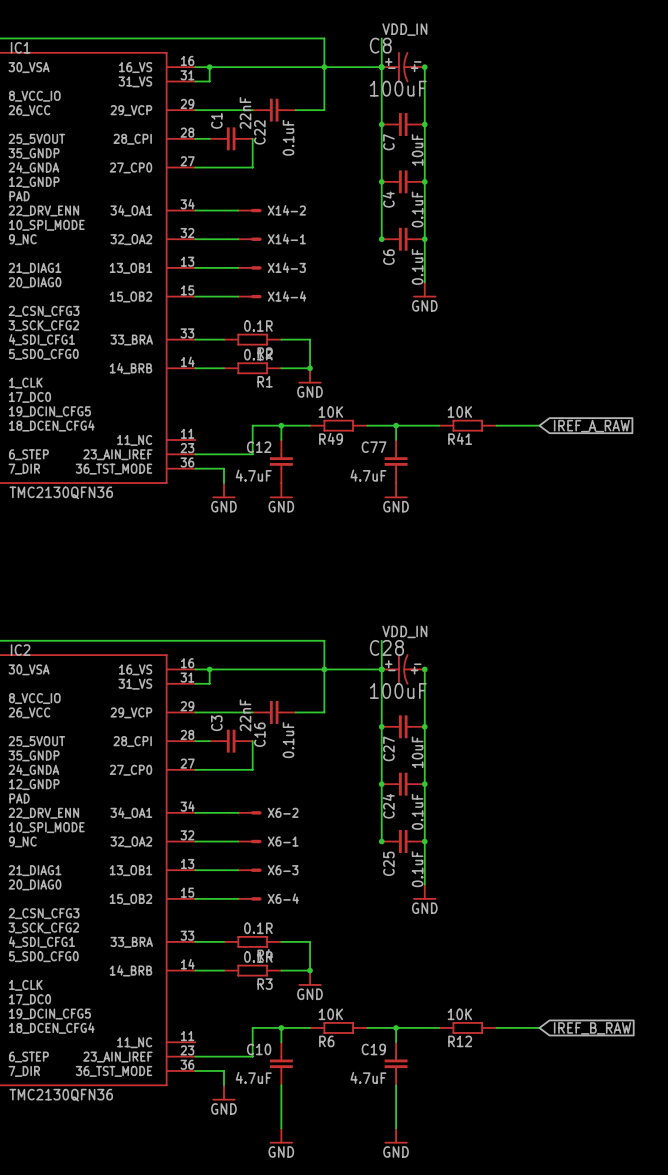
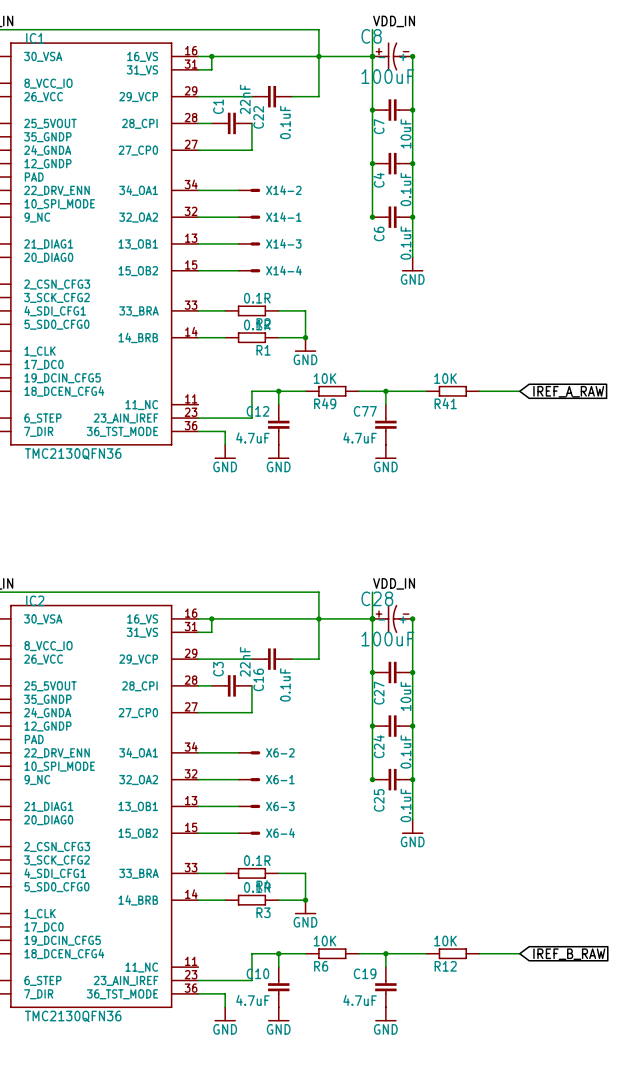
wire: (281, 1085) (281, 1128) -> none
wire: (396, 1085) (396, 1128) -> none
power symbol position: GND (281, 1135) -> GND (278, 1014)
power symbol position: GND (396, 1135) -> GND (385, 1014)

